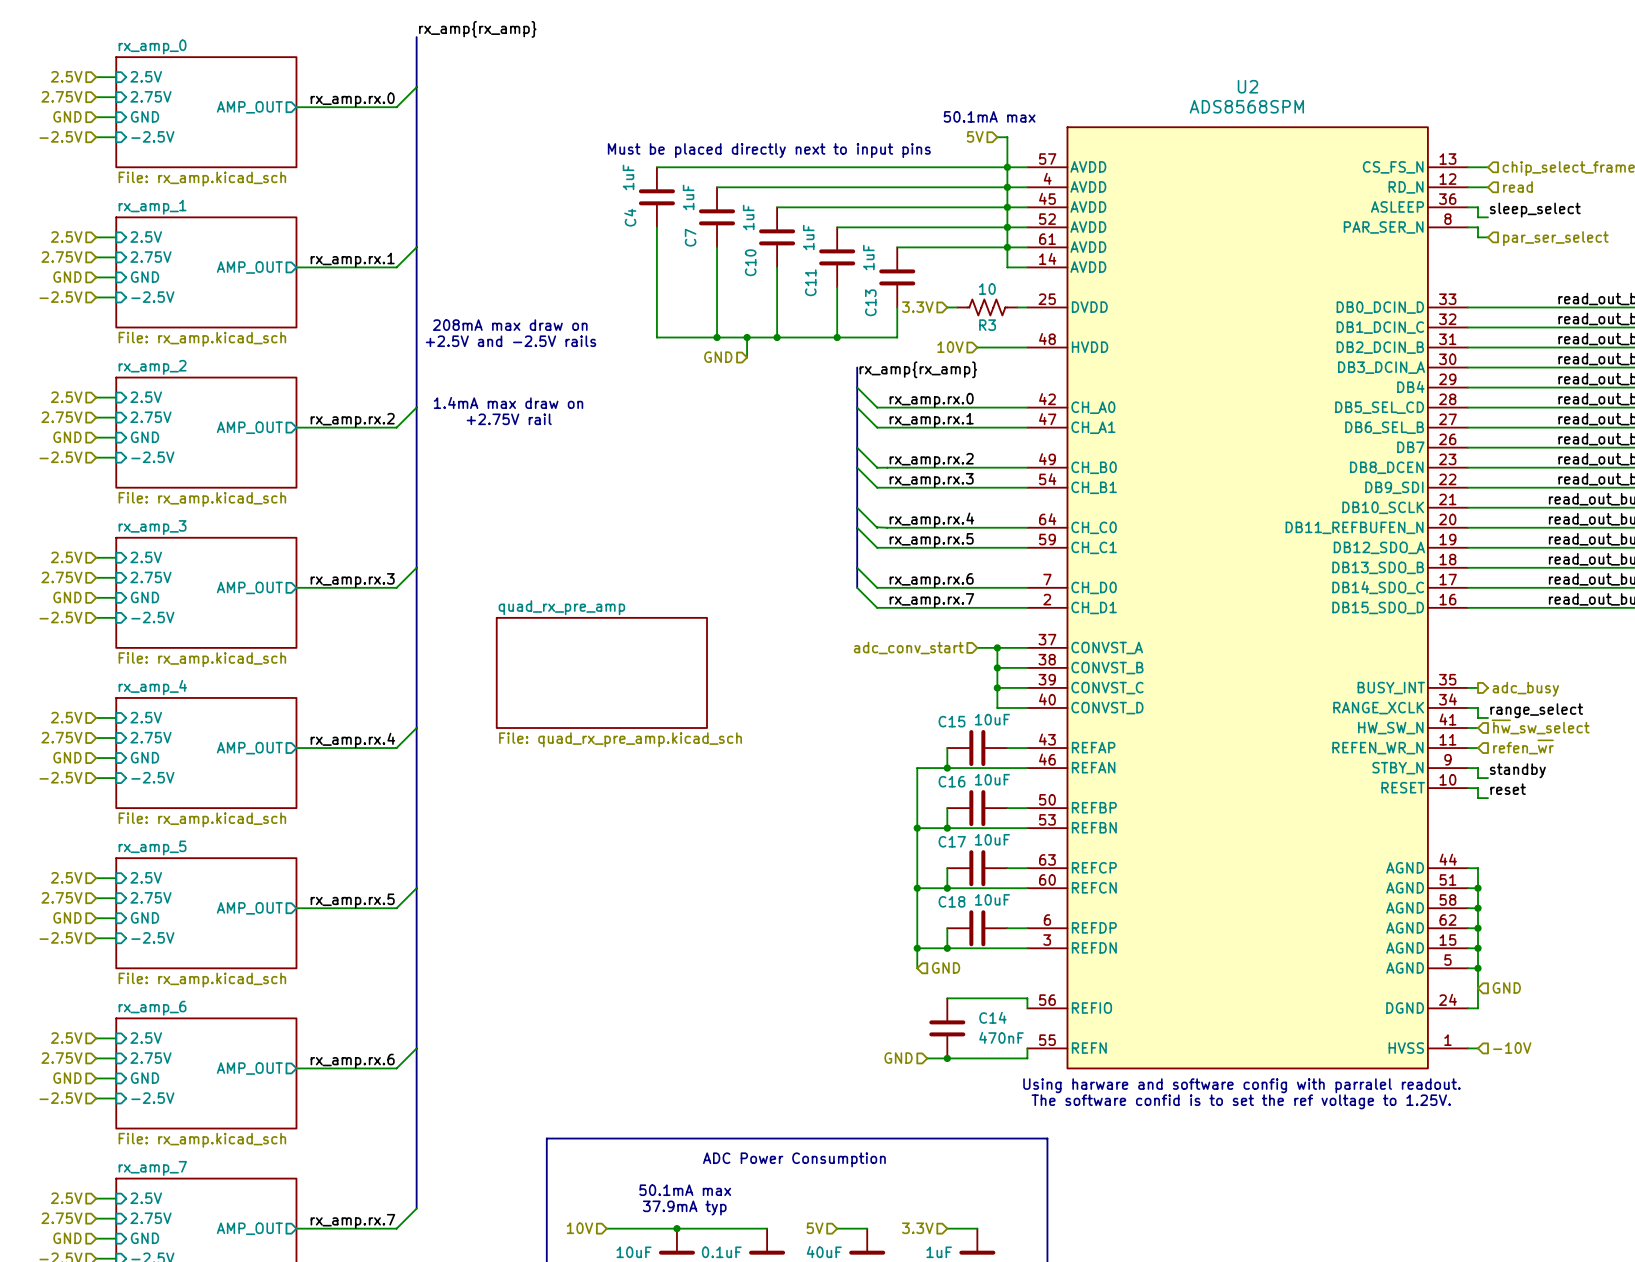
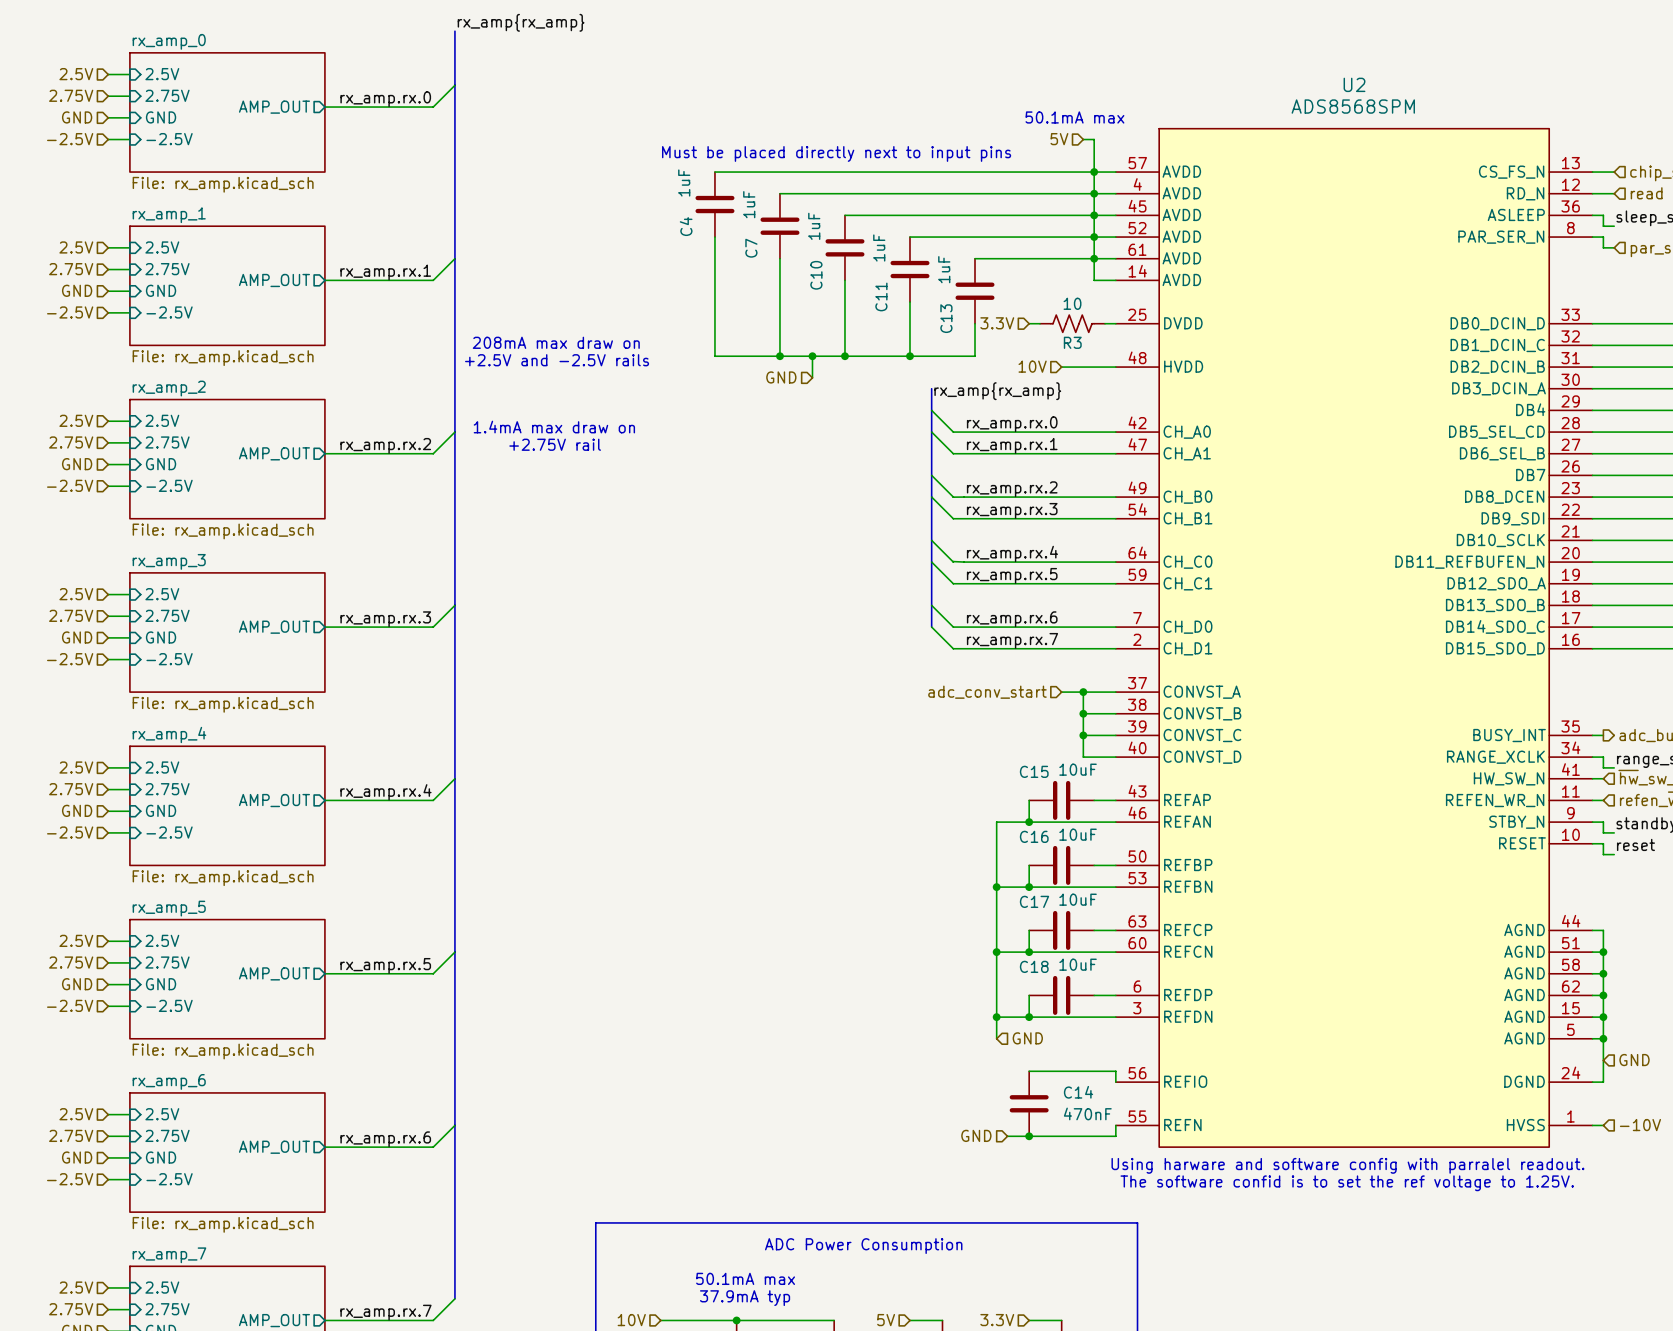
sheet quad_rx_pre_amp: File: quad_rx_pre_amp.kicad_sch (601, 672) -> none

